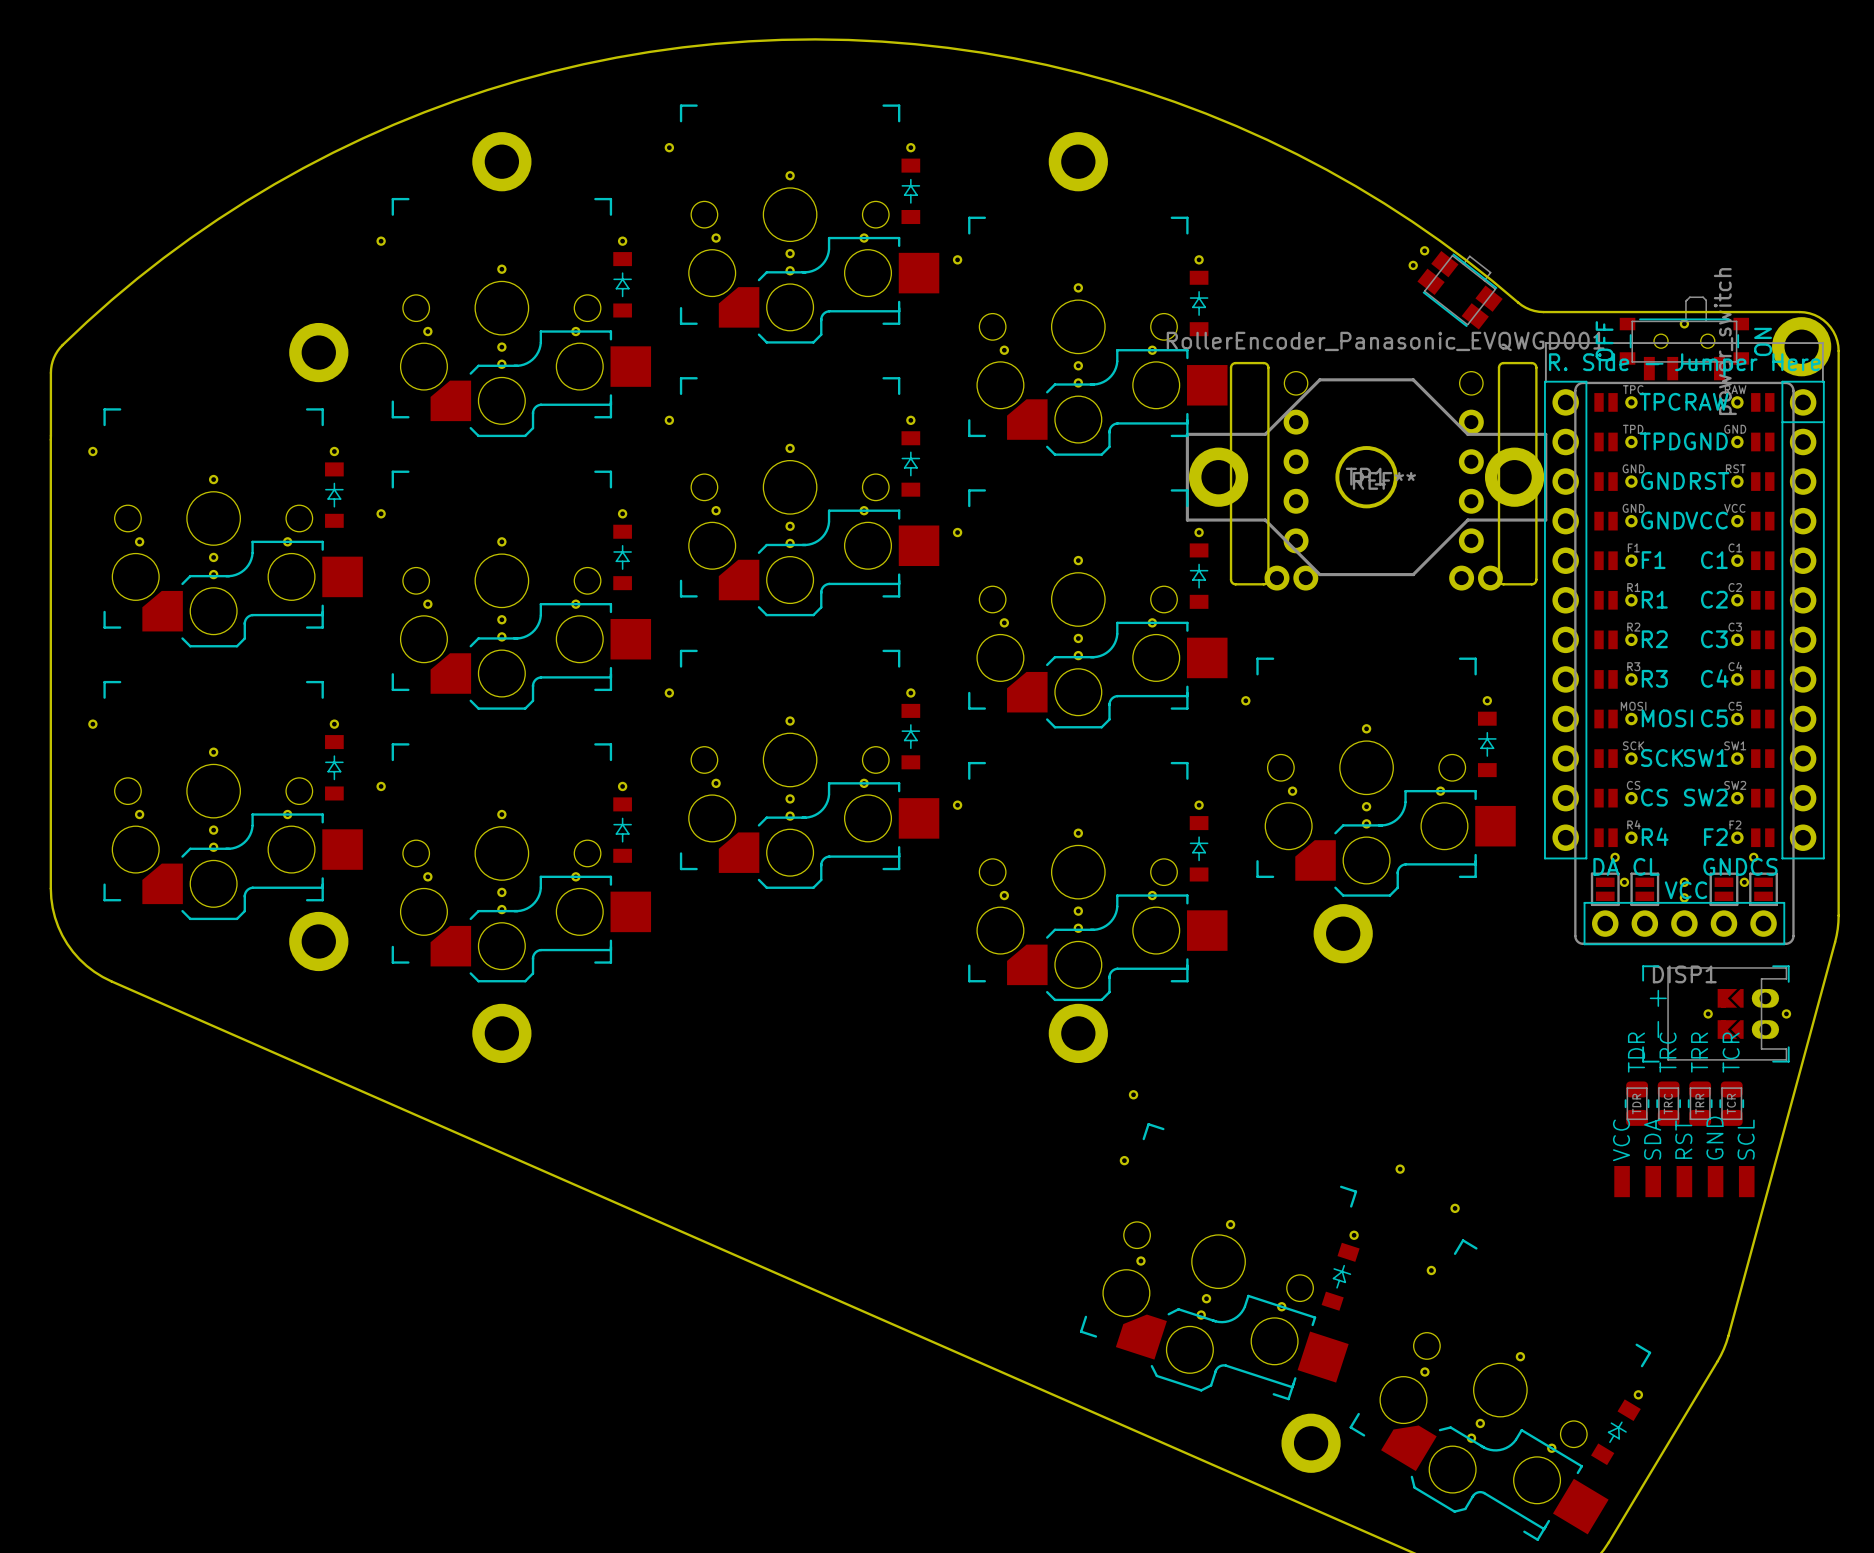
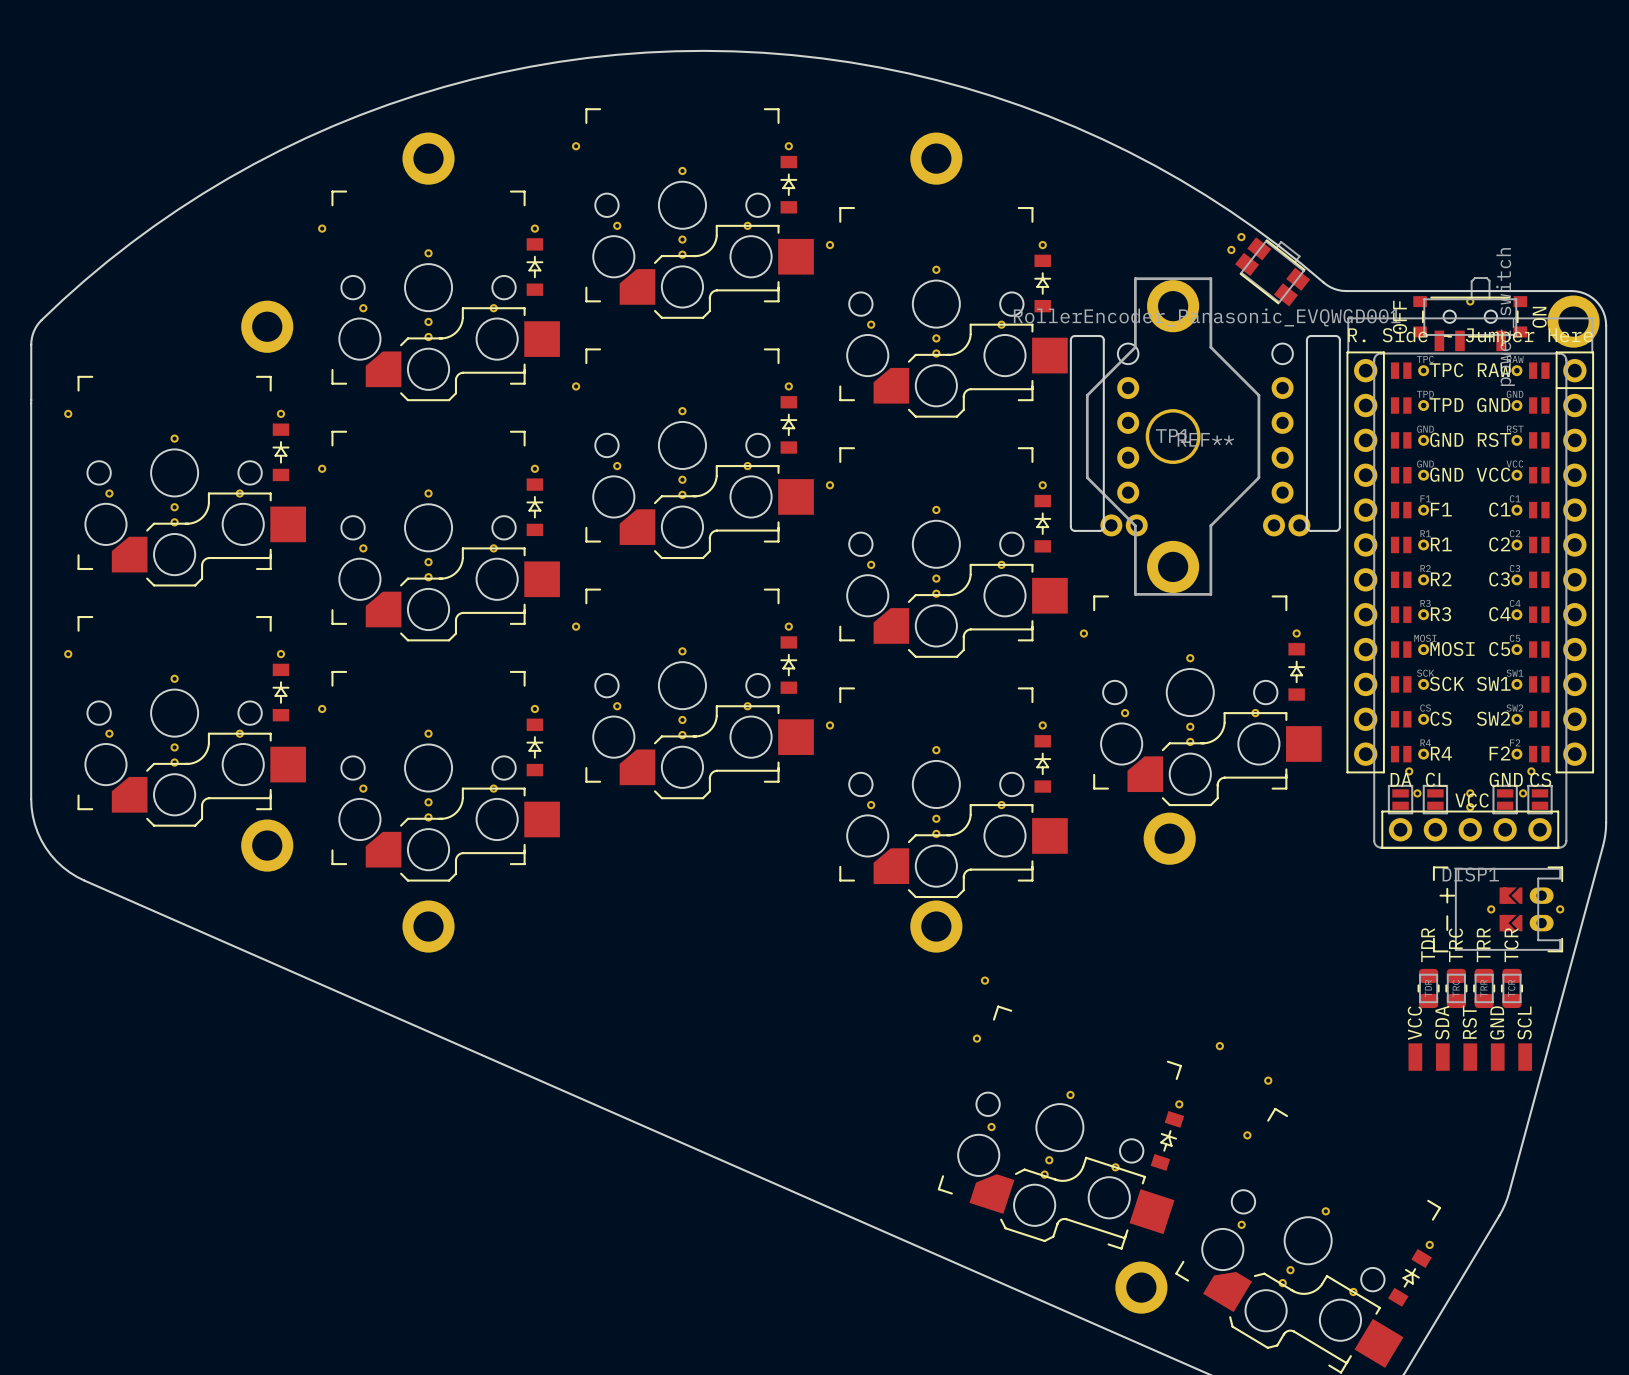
TP1 rotation: 0° (1366, 477) -> 90° clockwise (1173, 436)

